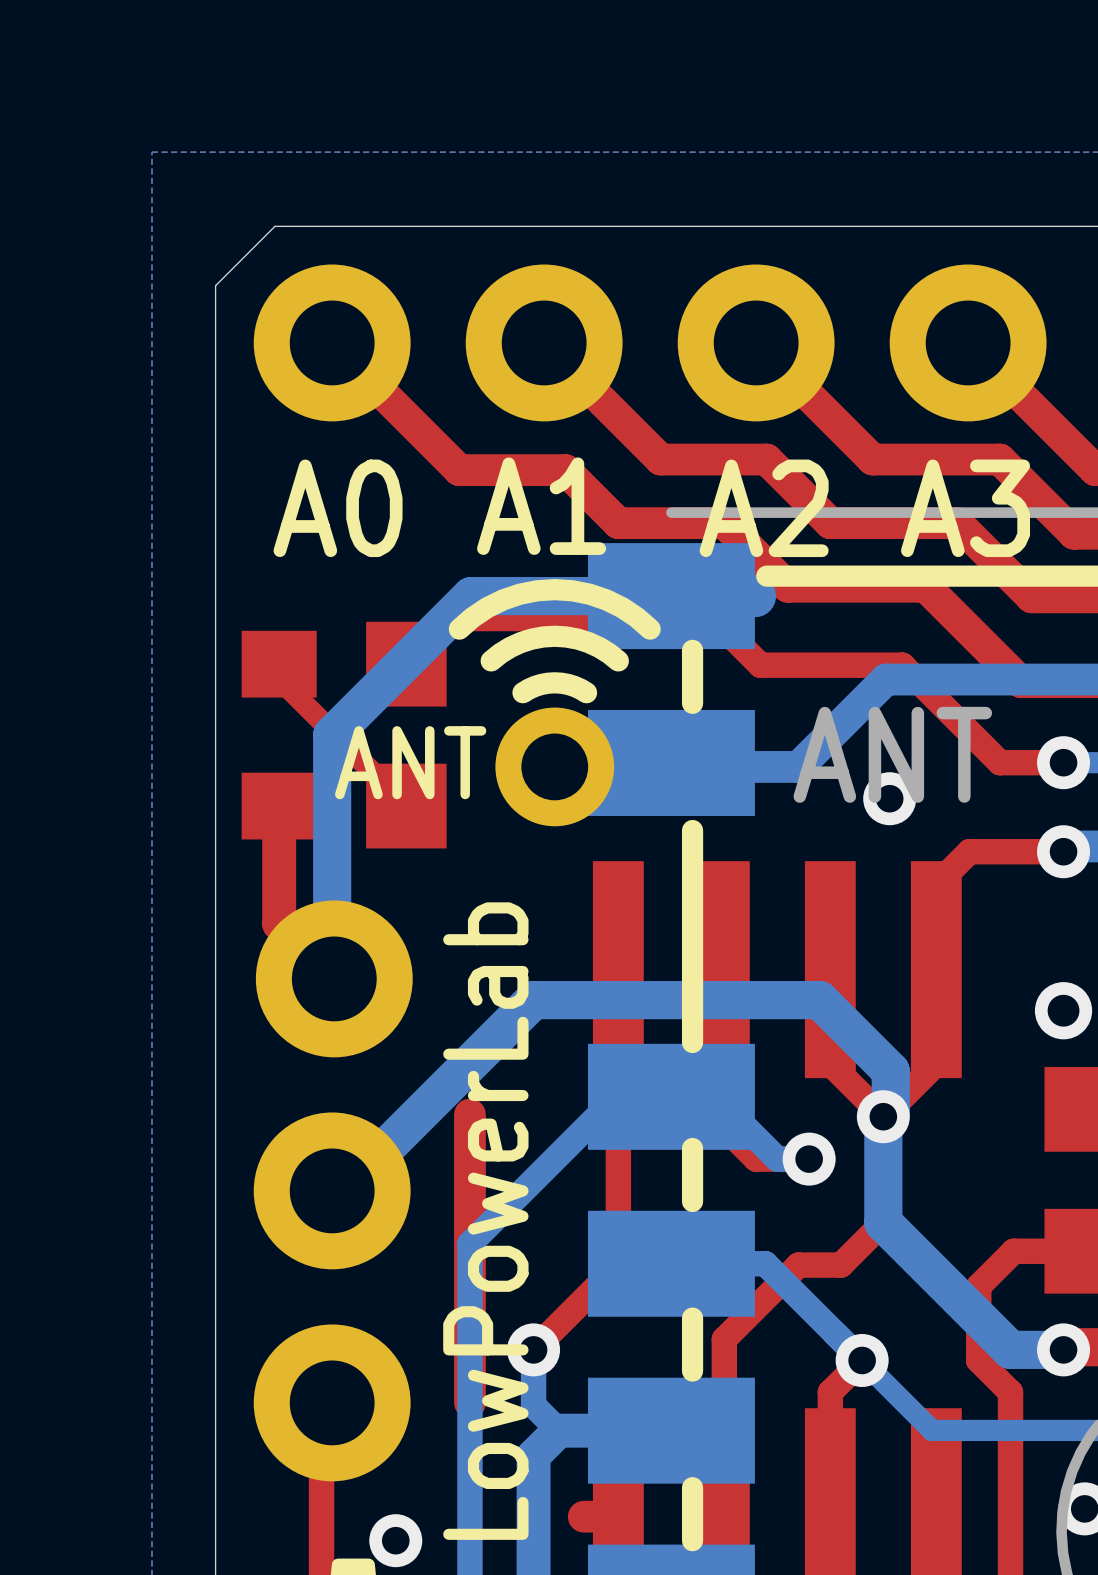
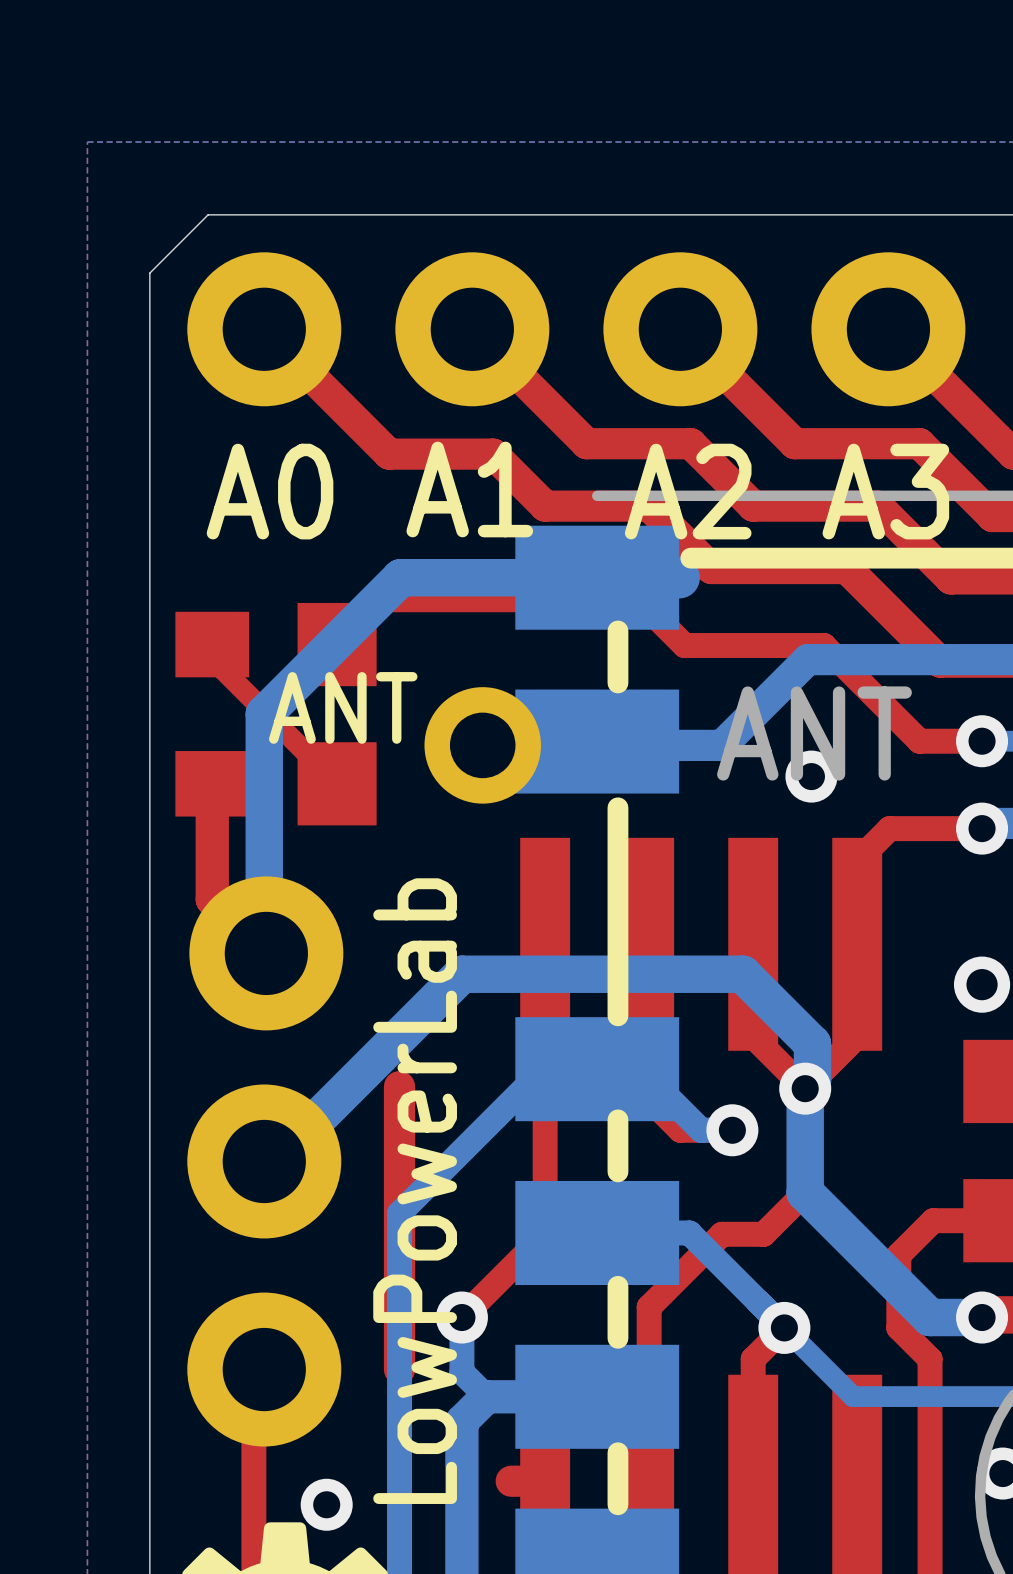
line: (650, 629) (622, 607) (606, 599) (589, 594) (554, 589) (519, 594) (503, 599) (487, 607) (459, 629) -> none
line: (618, 660) (588, 642) (554, 636) (520, 642) (491, 660) -> none
line: (586, 692) (574, 686) (554, 682) (534, 686) (522, 692) -> none
text position: ANT (410, 762) -> ANT (343, 707)

